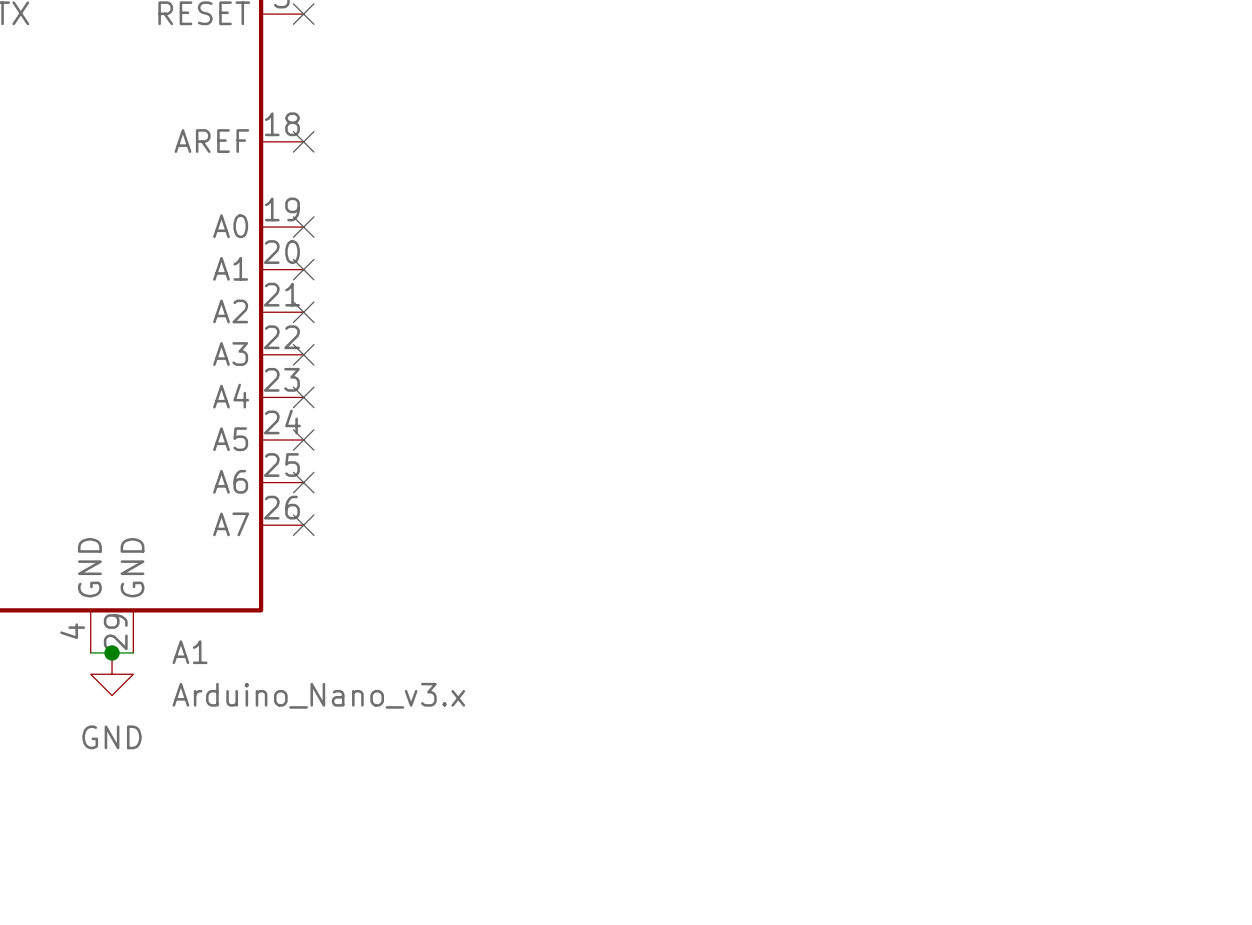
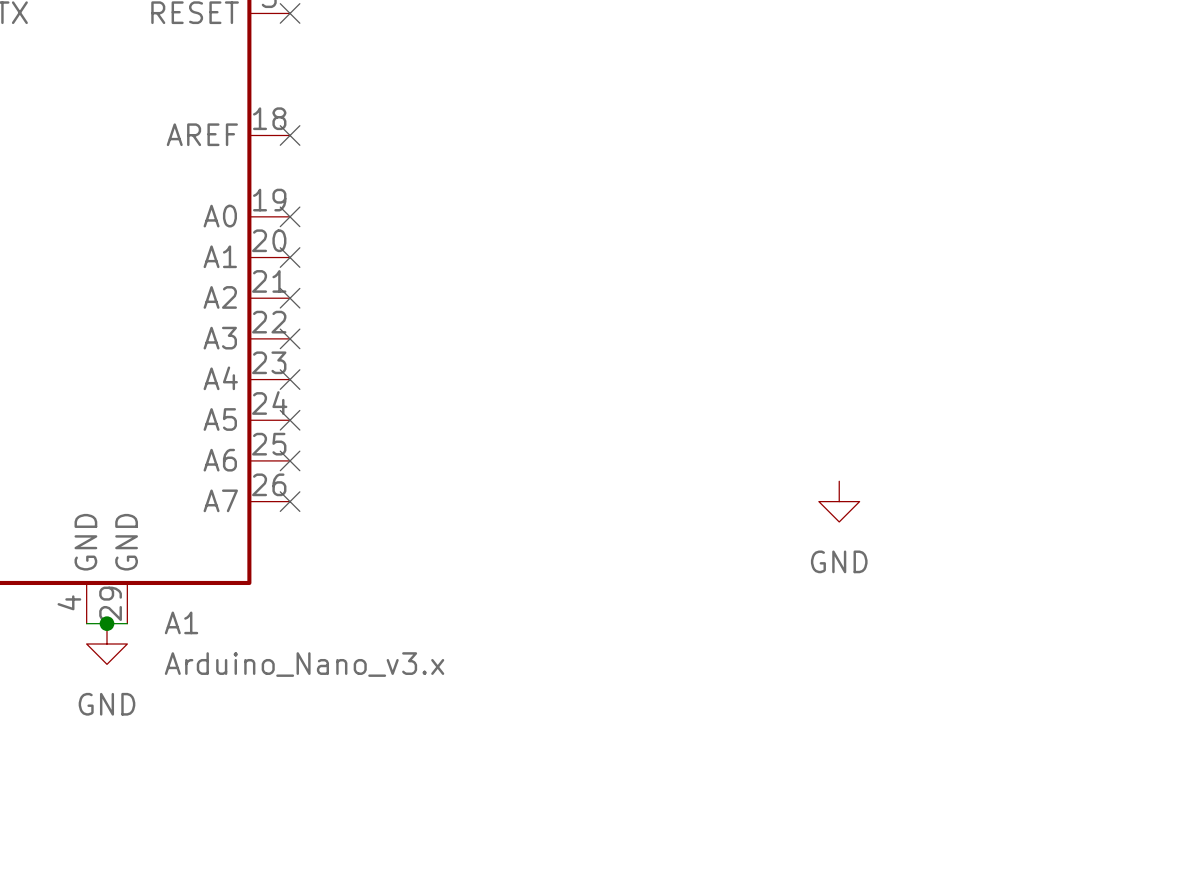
power symbol: none -> GND (839, 501)

